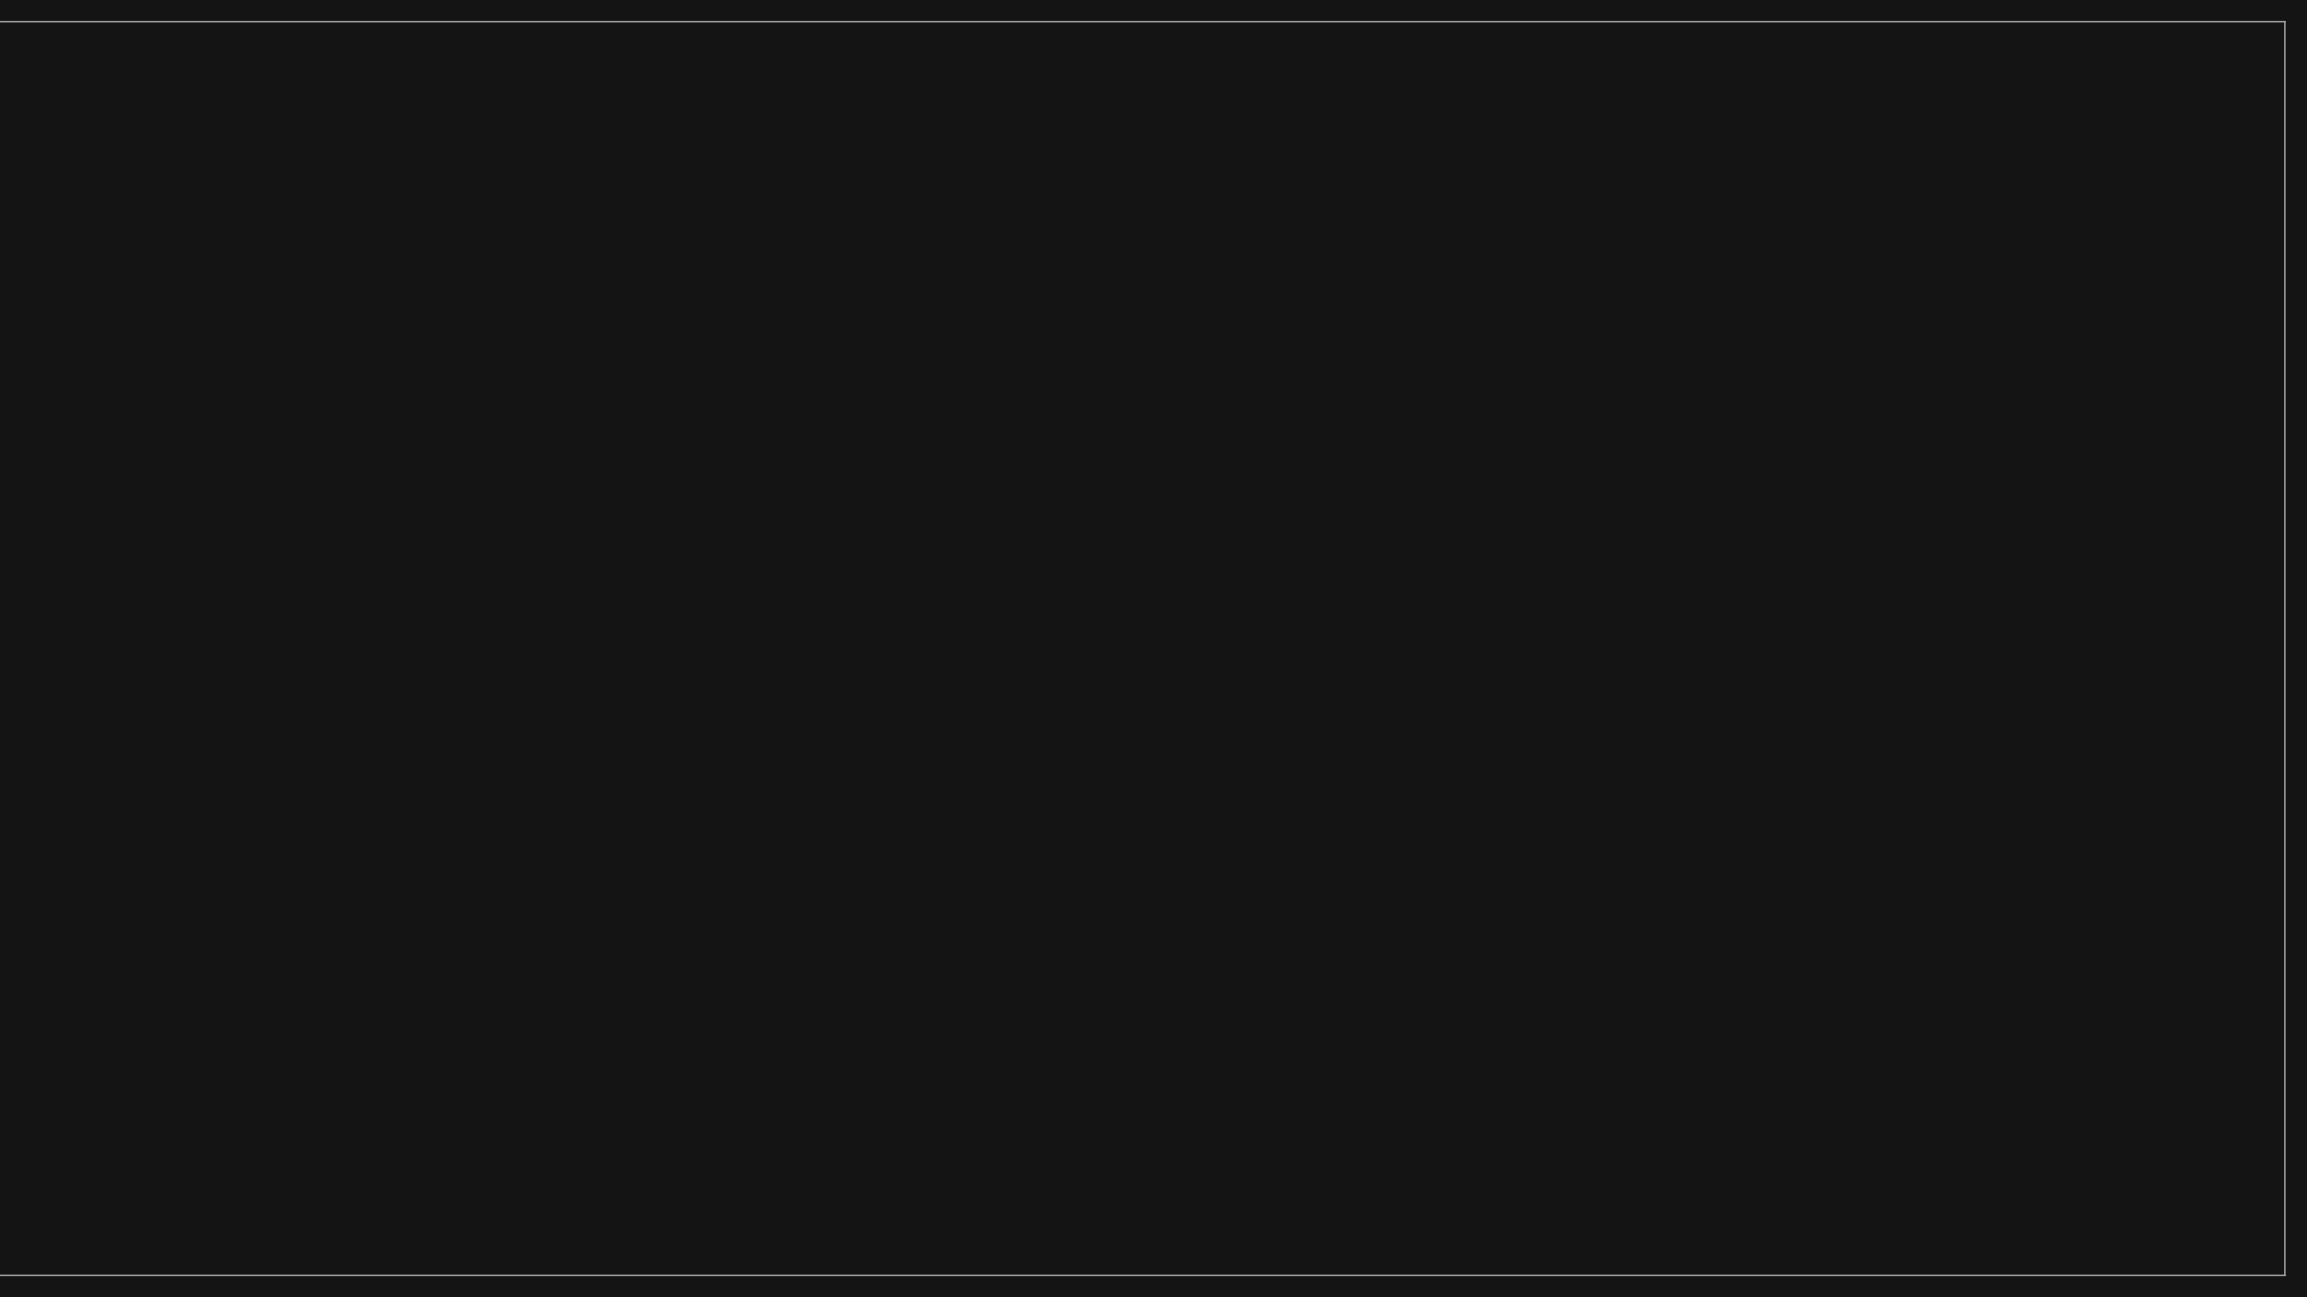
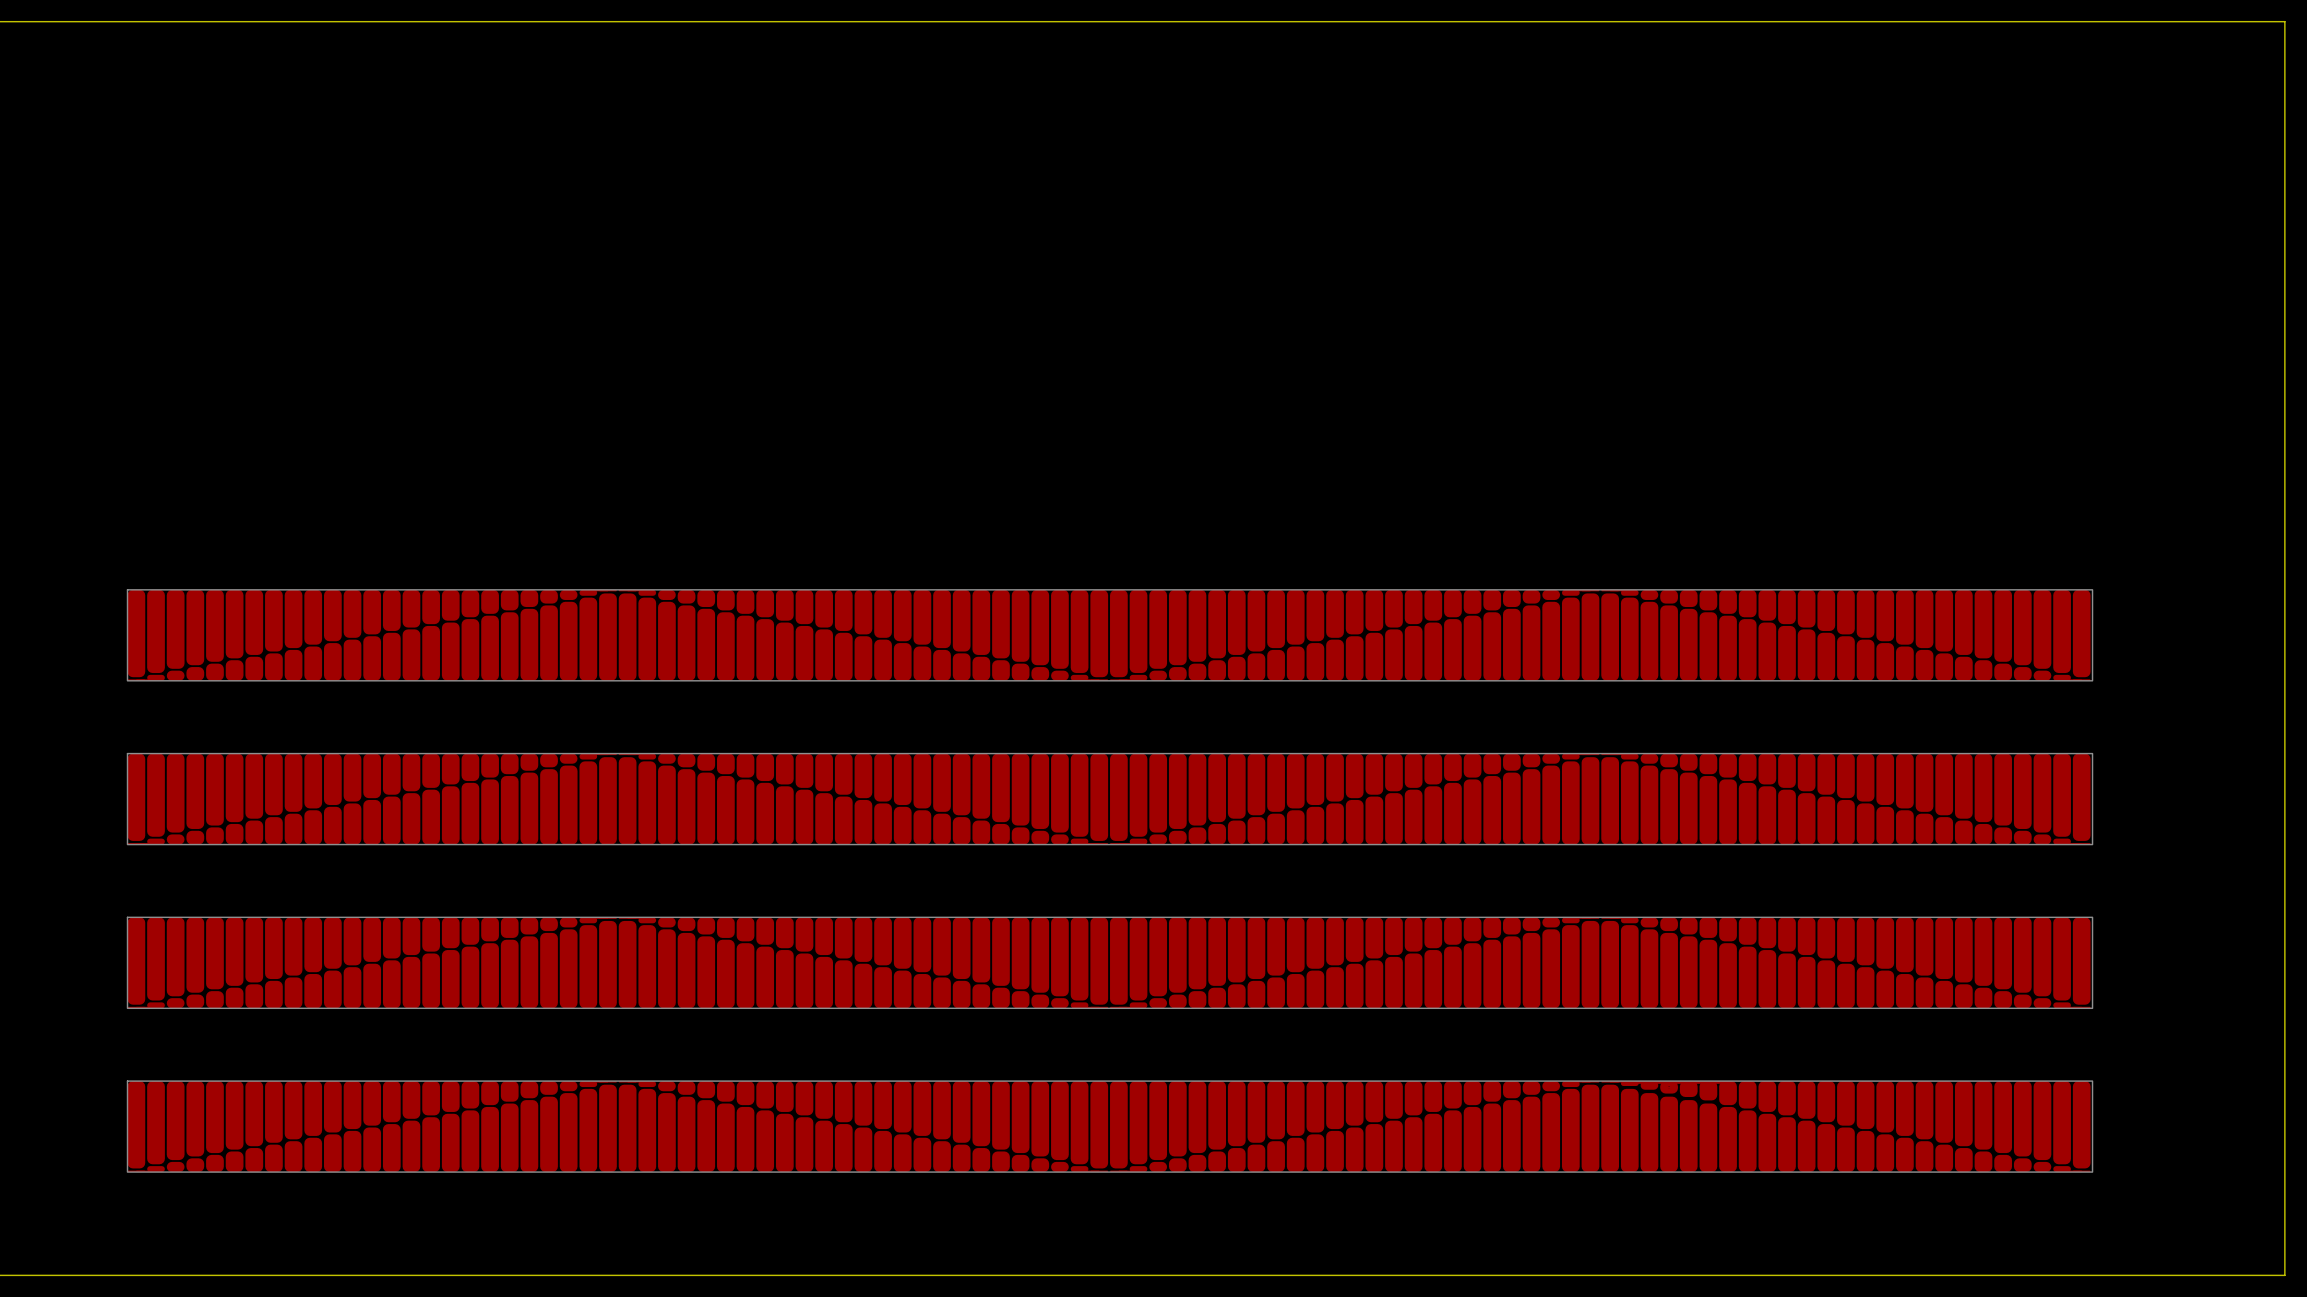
part: none -> (1110, 635)
part: none -> (1110, 799)
part: none -> (1110, 962)
part: none -> (1110, 1126)

